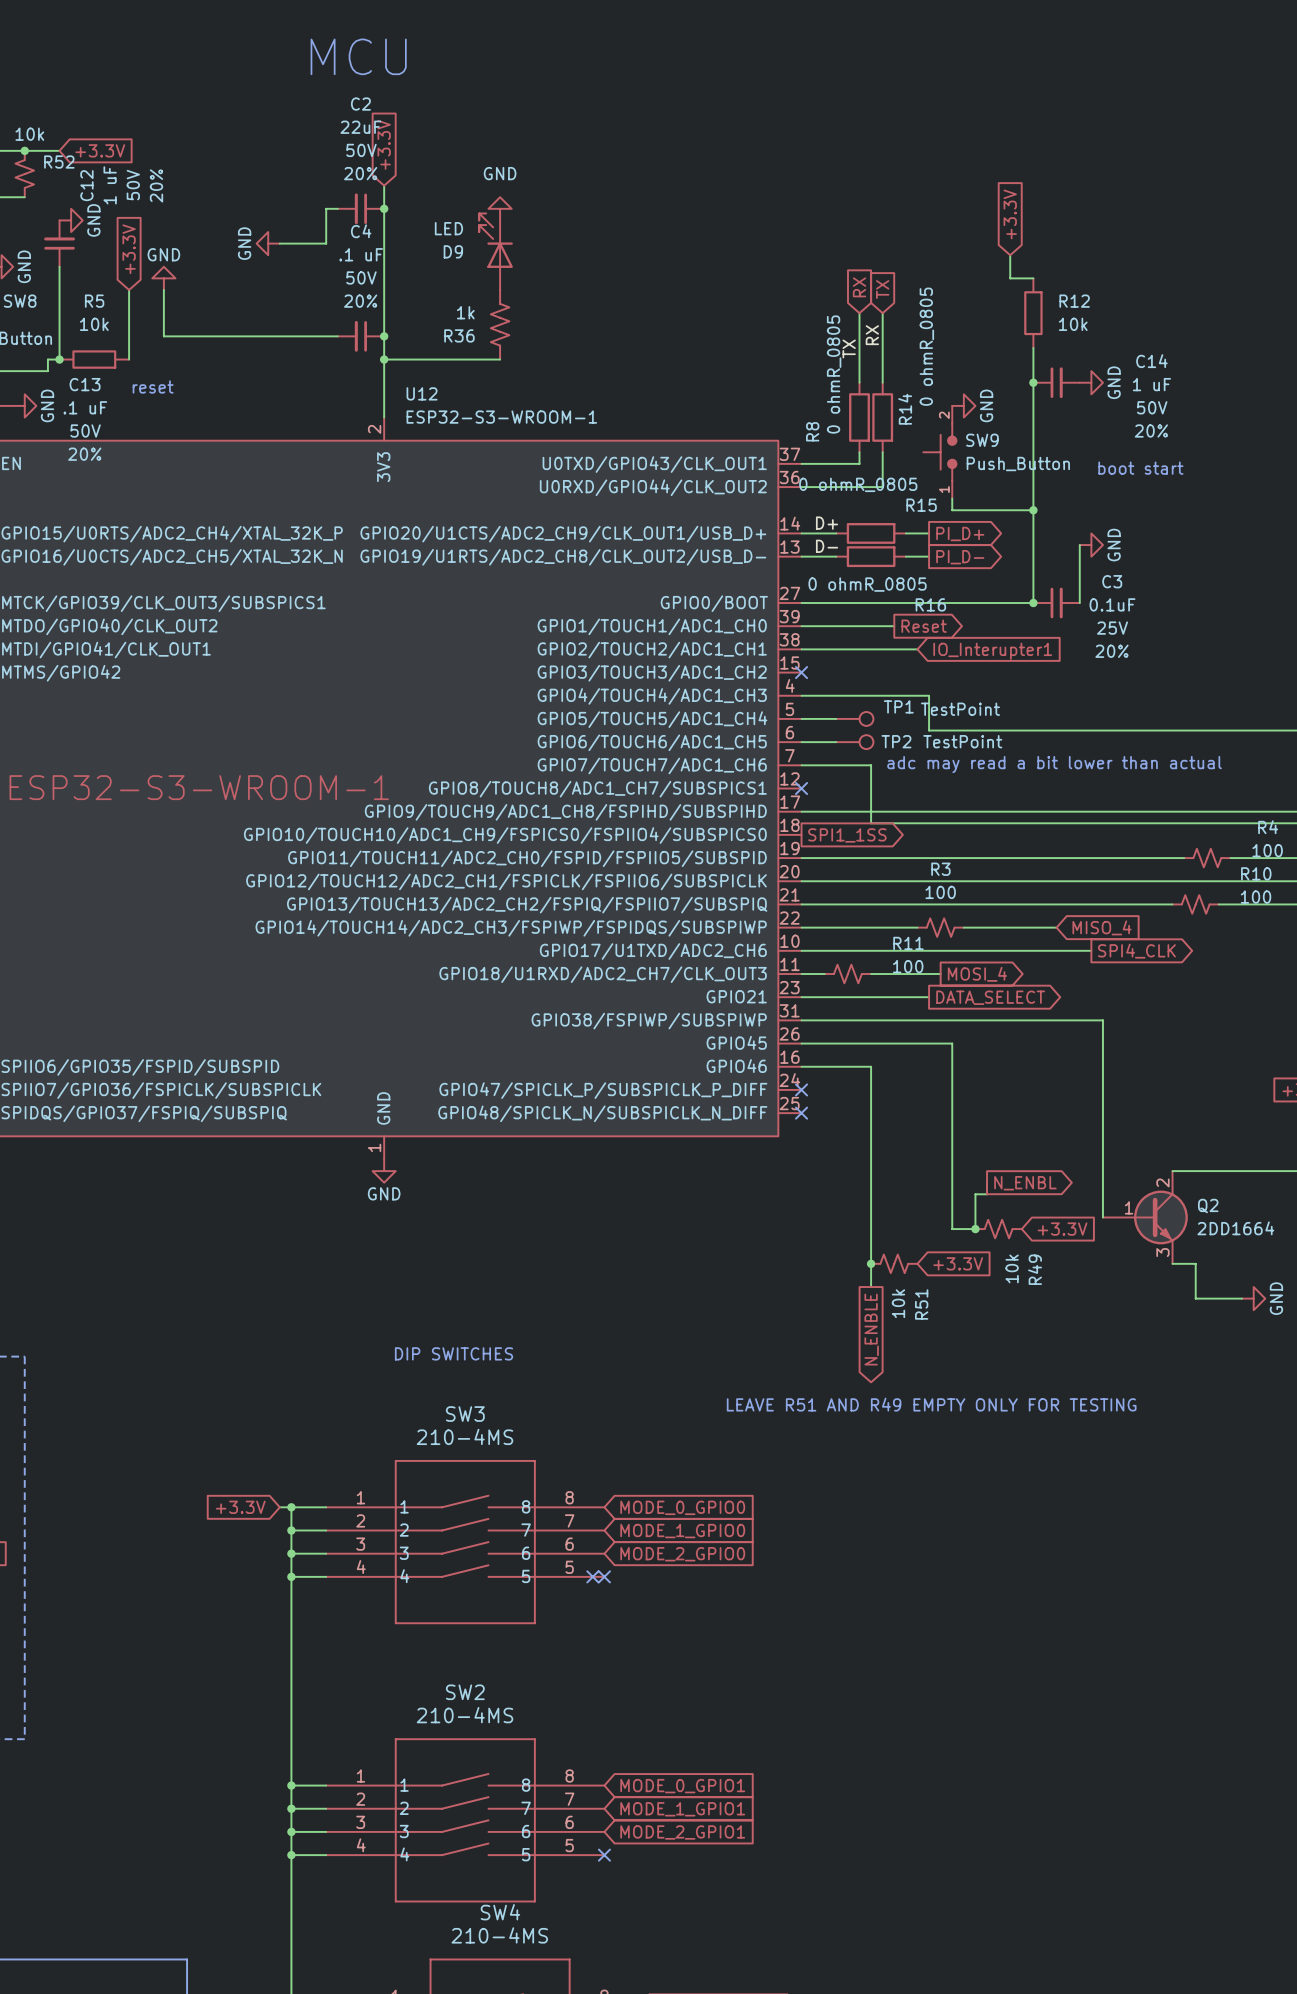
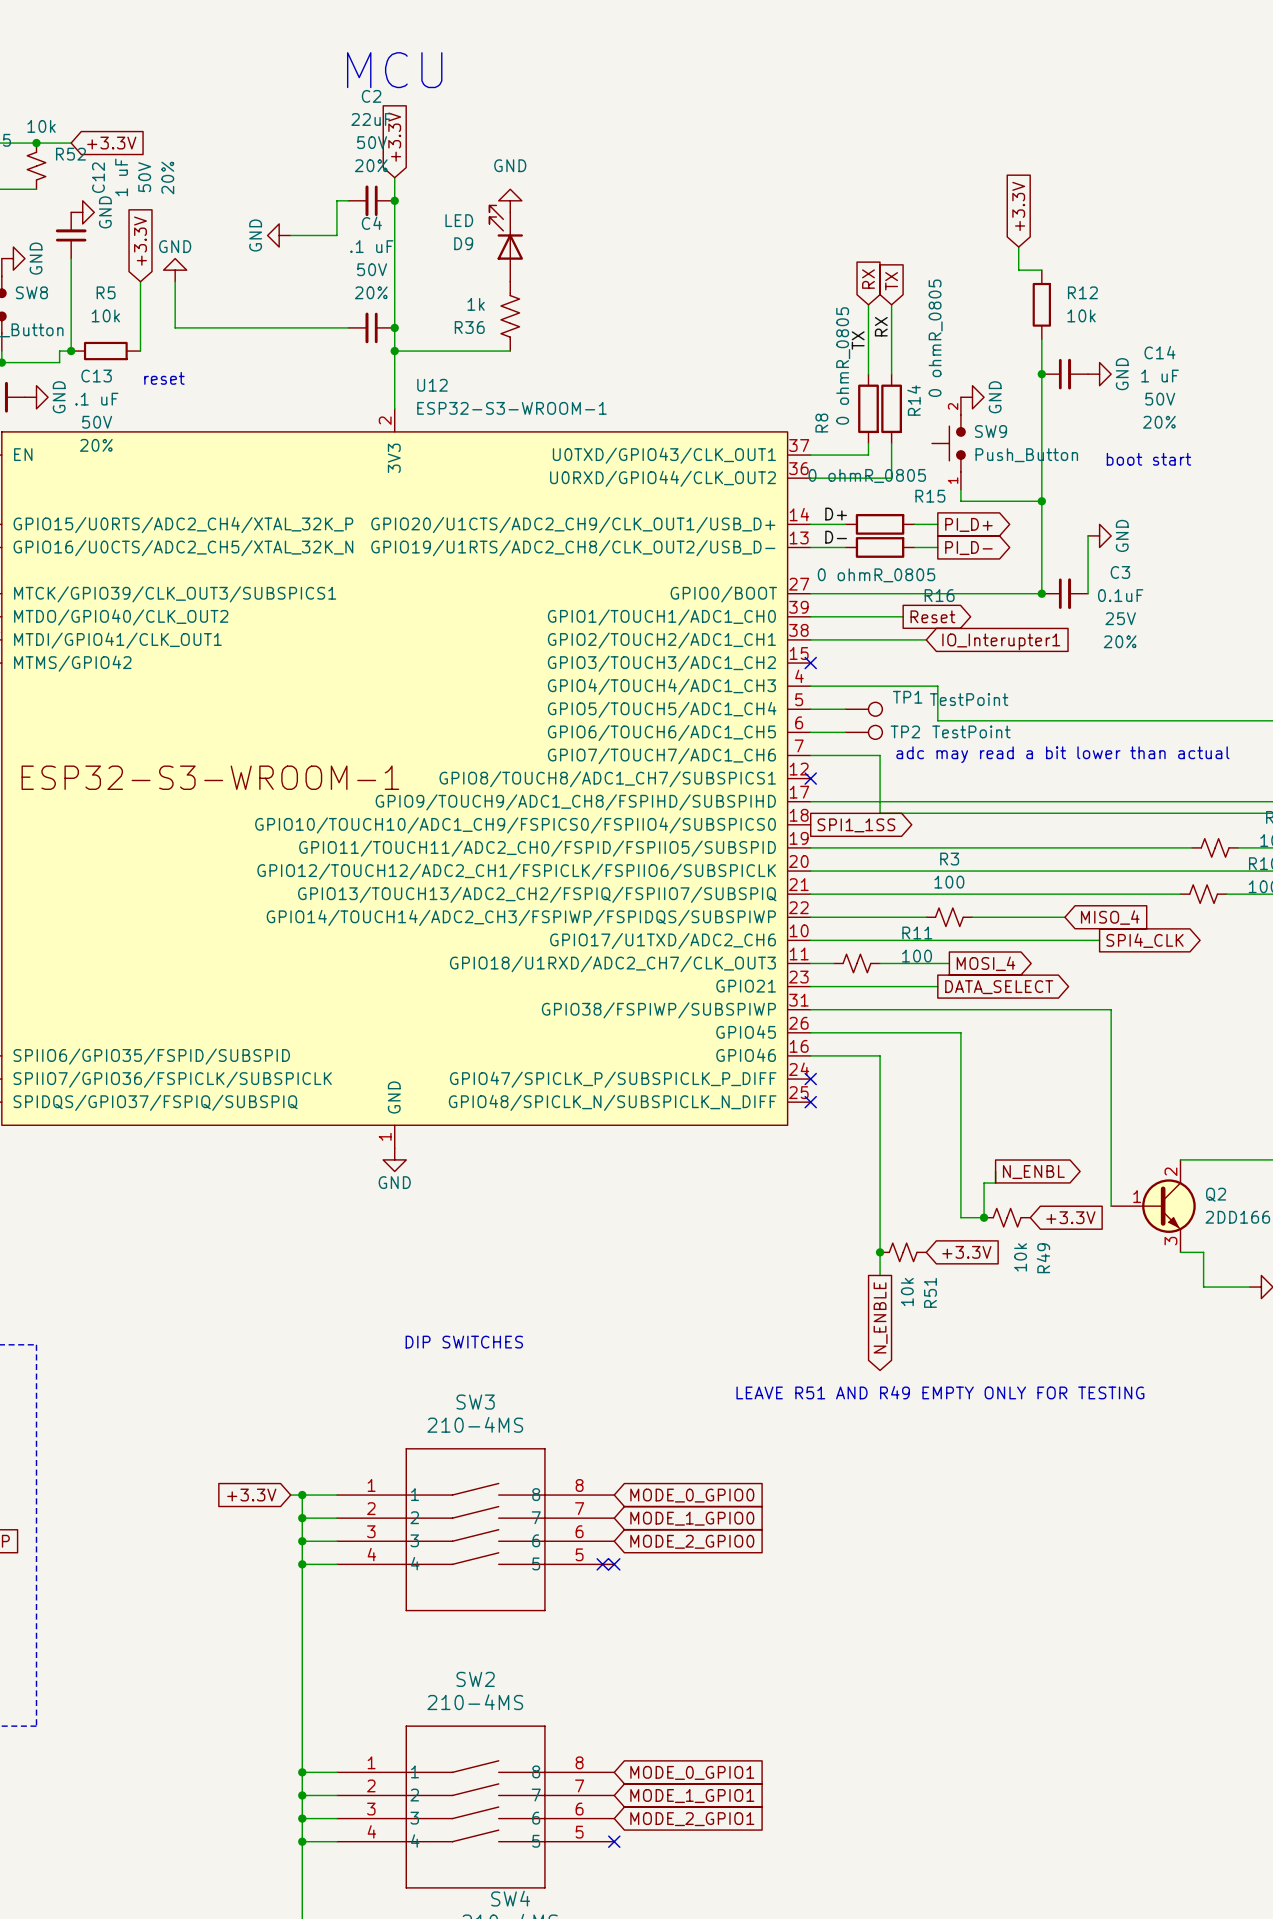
text position: MCU (358, 56) -> MCU (394, 70)

